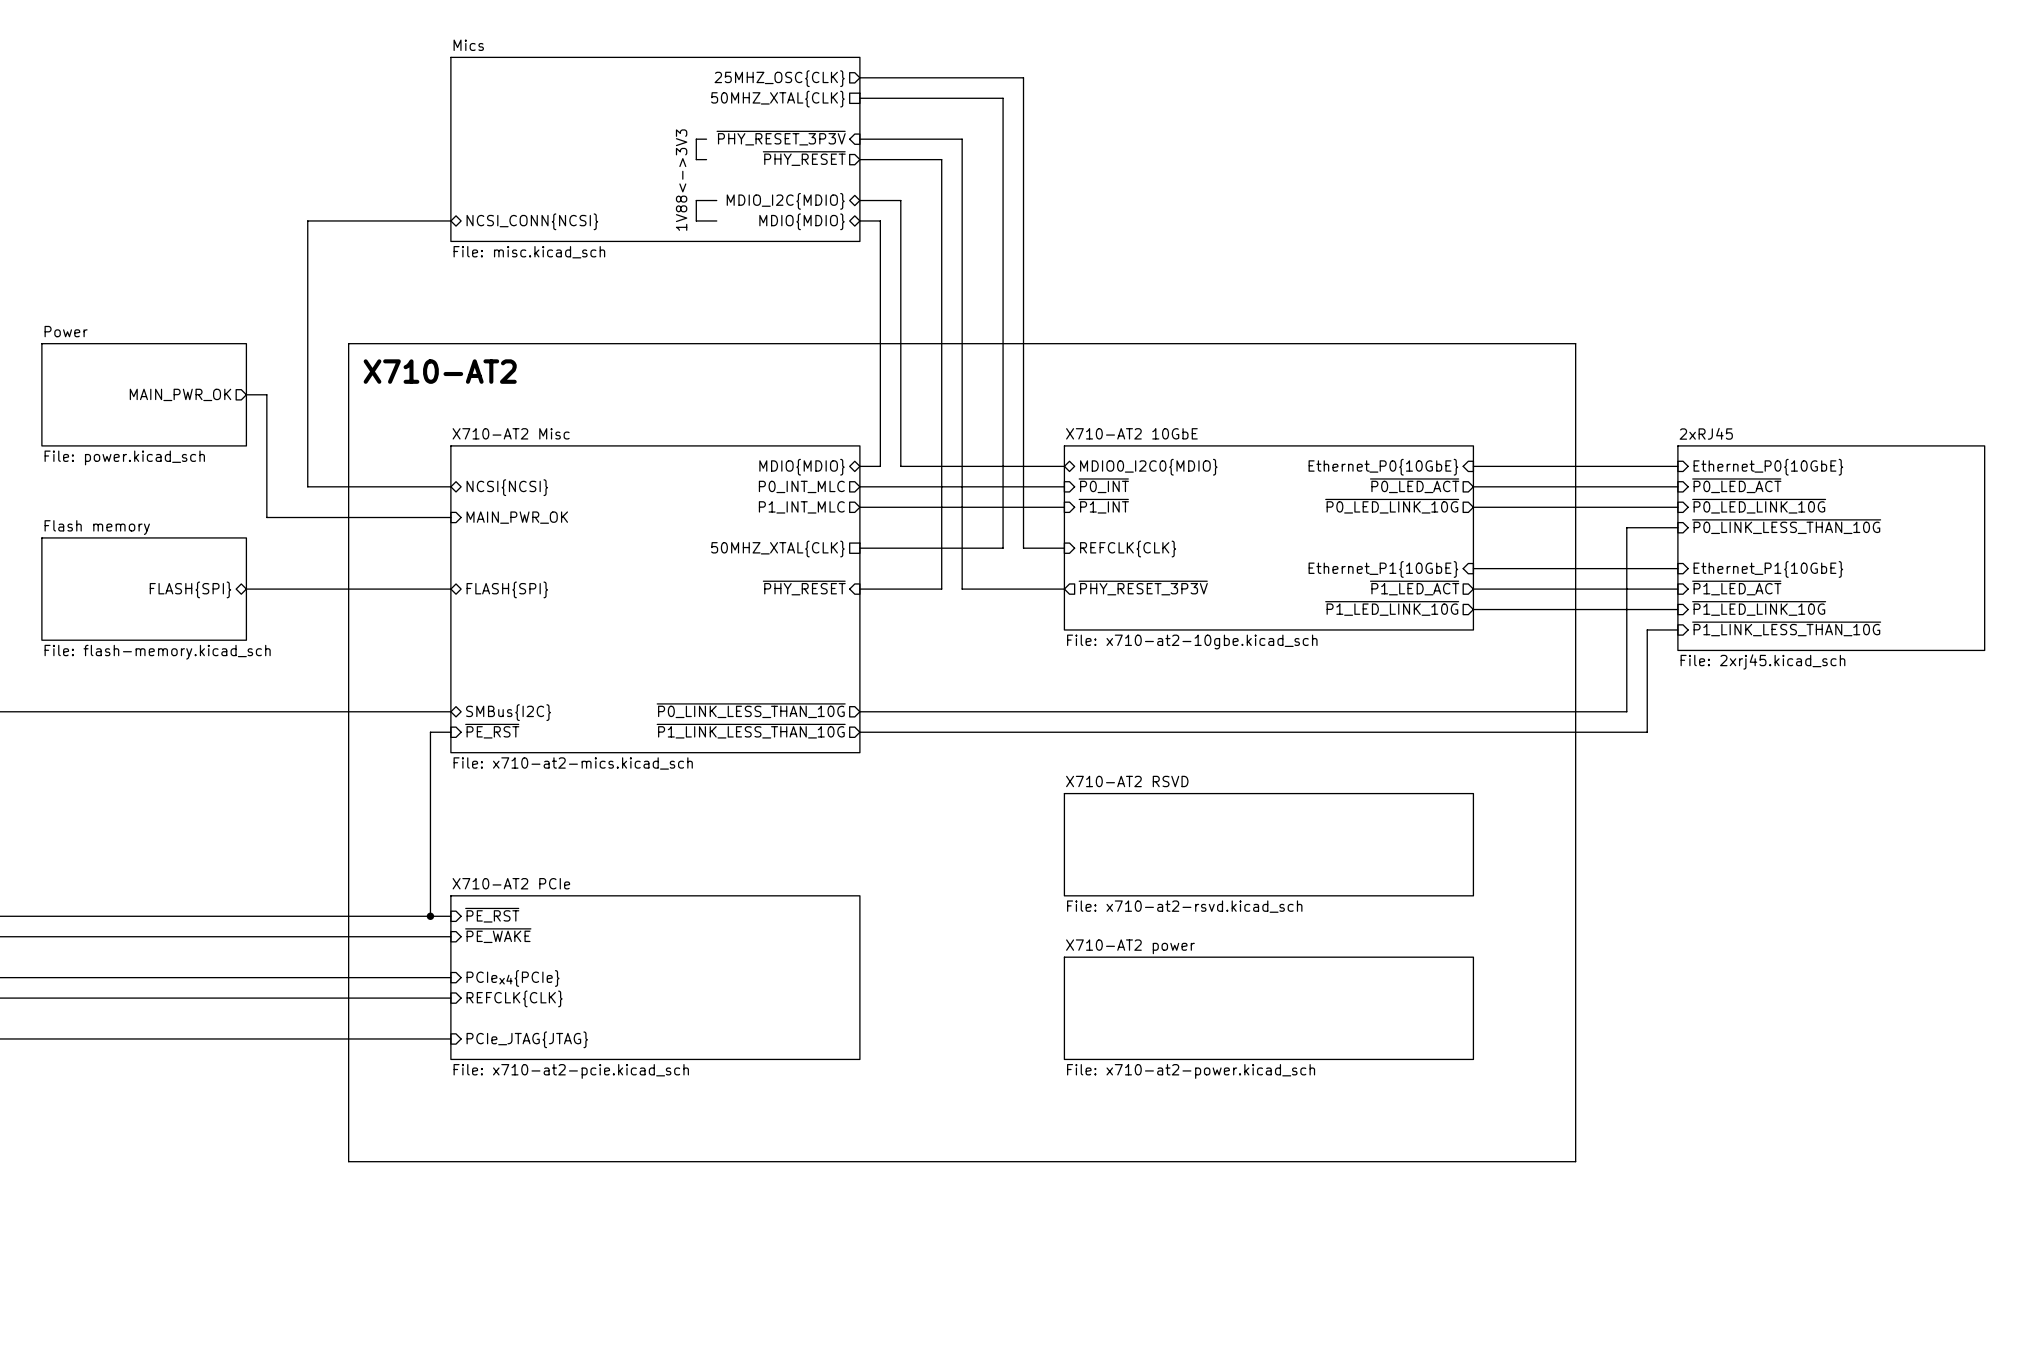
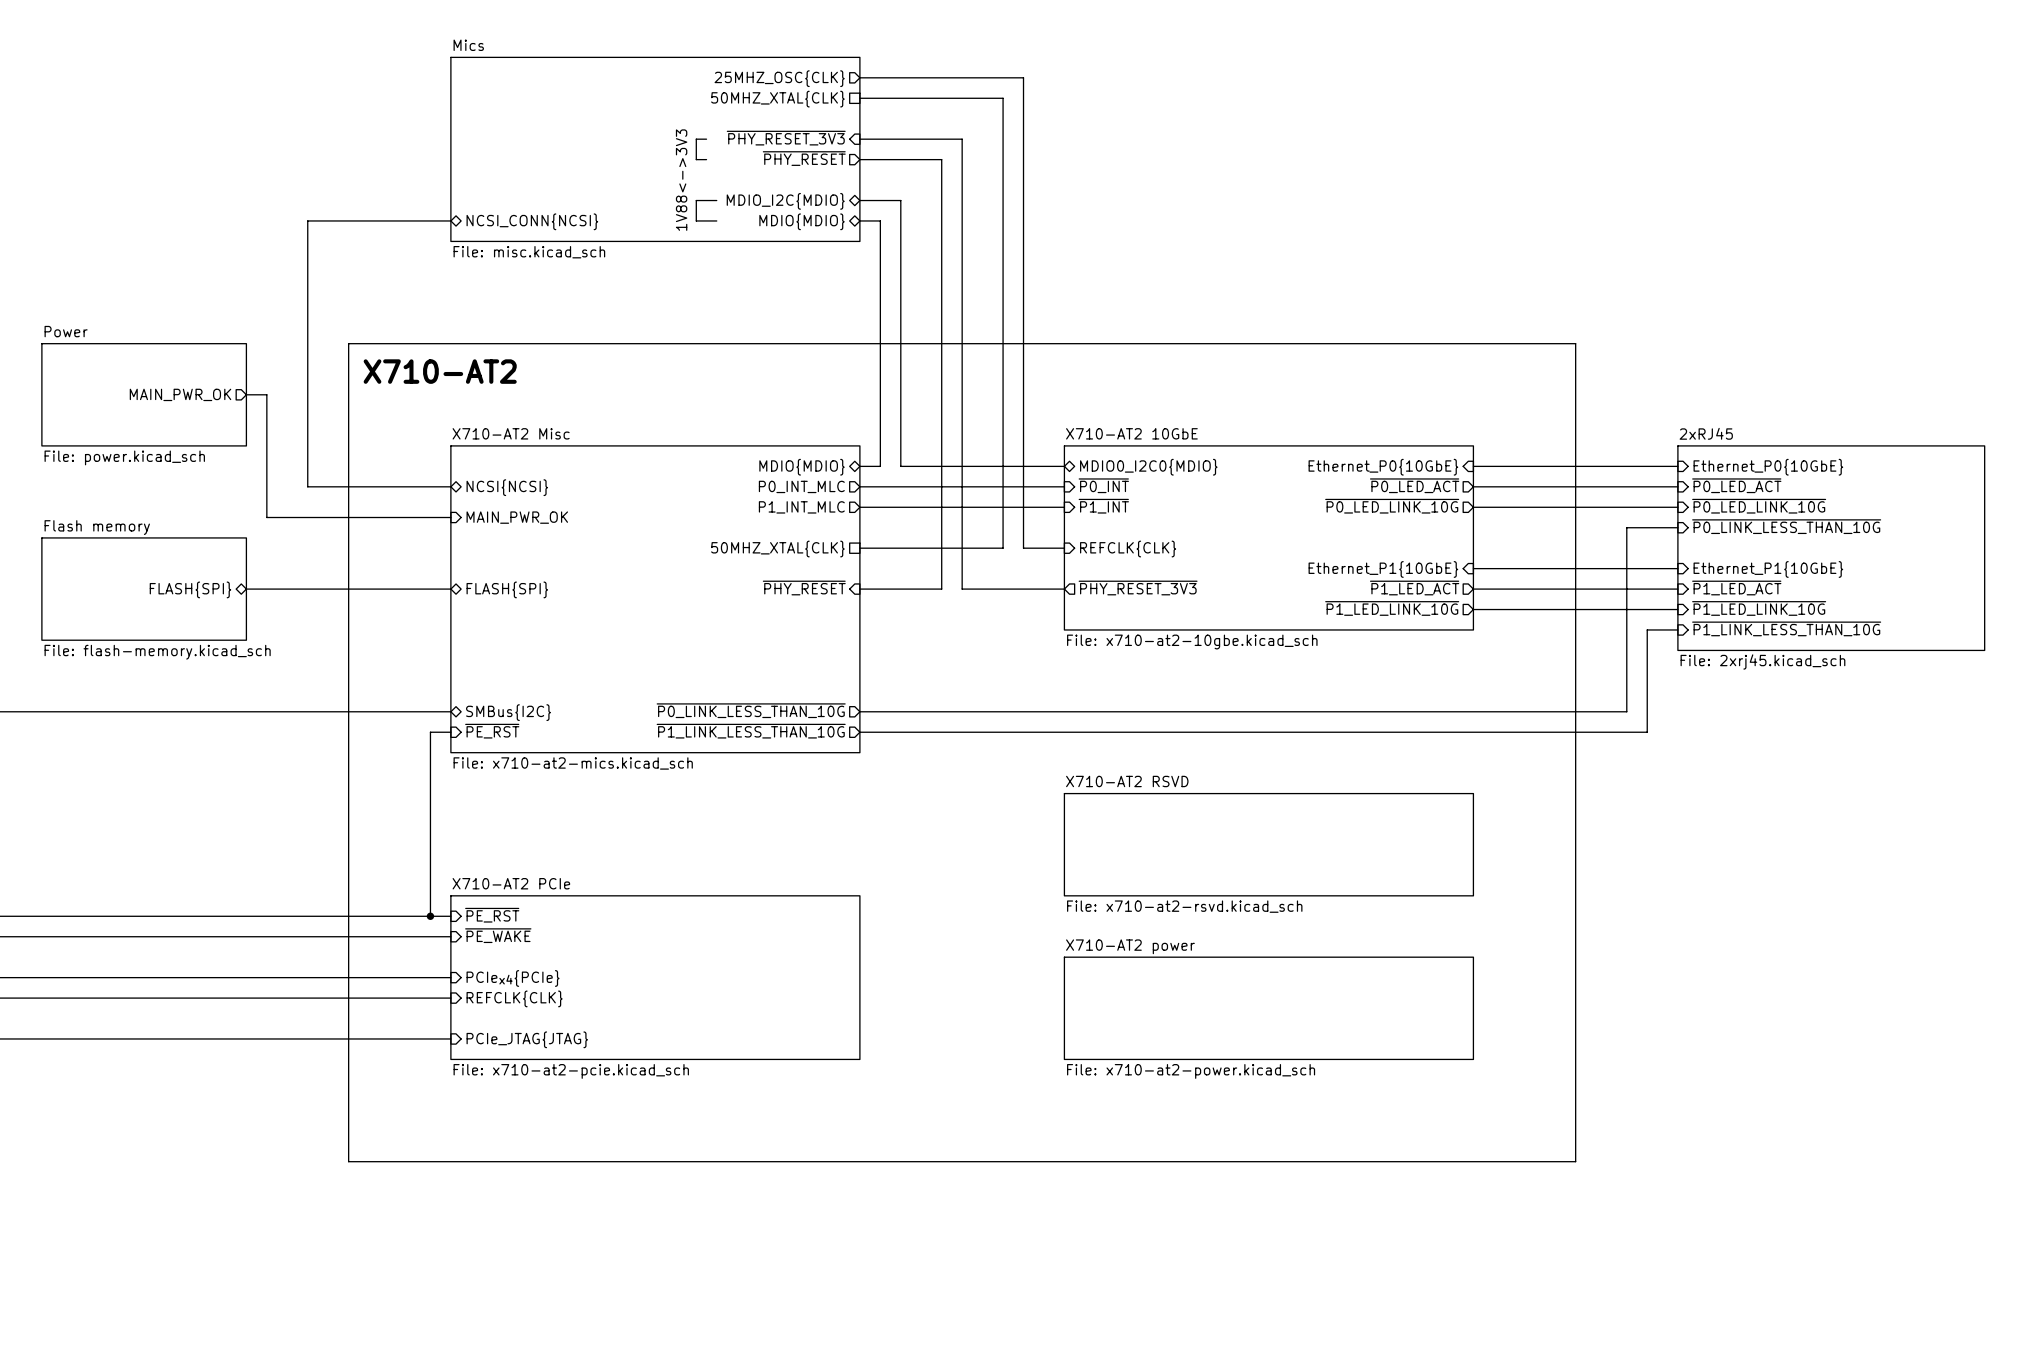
sheet pin: ~{PHY_RESET_3P3V} (781, 138) -> ~{PHY_RESET_3V3} (786, 138)
sheet pin: ~{PHY_RESET_3P3V} (1143, 588) -> ~{PHY_RESET_3V3} (1138, 588)

